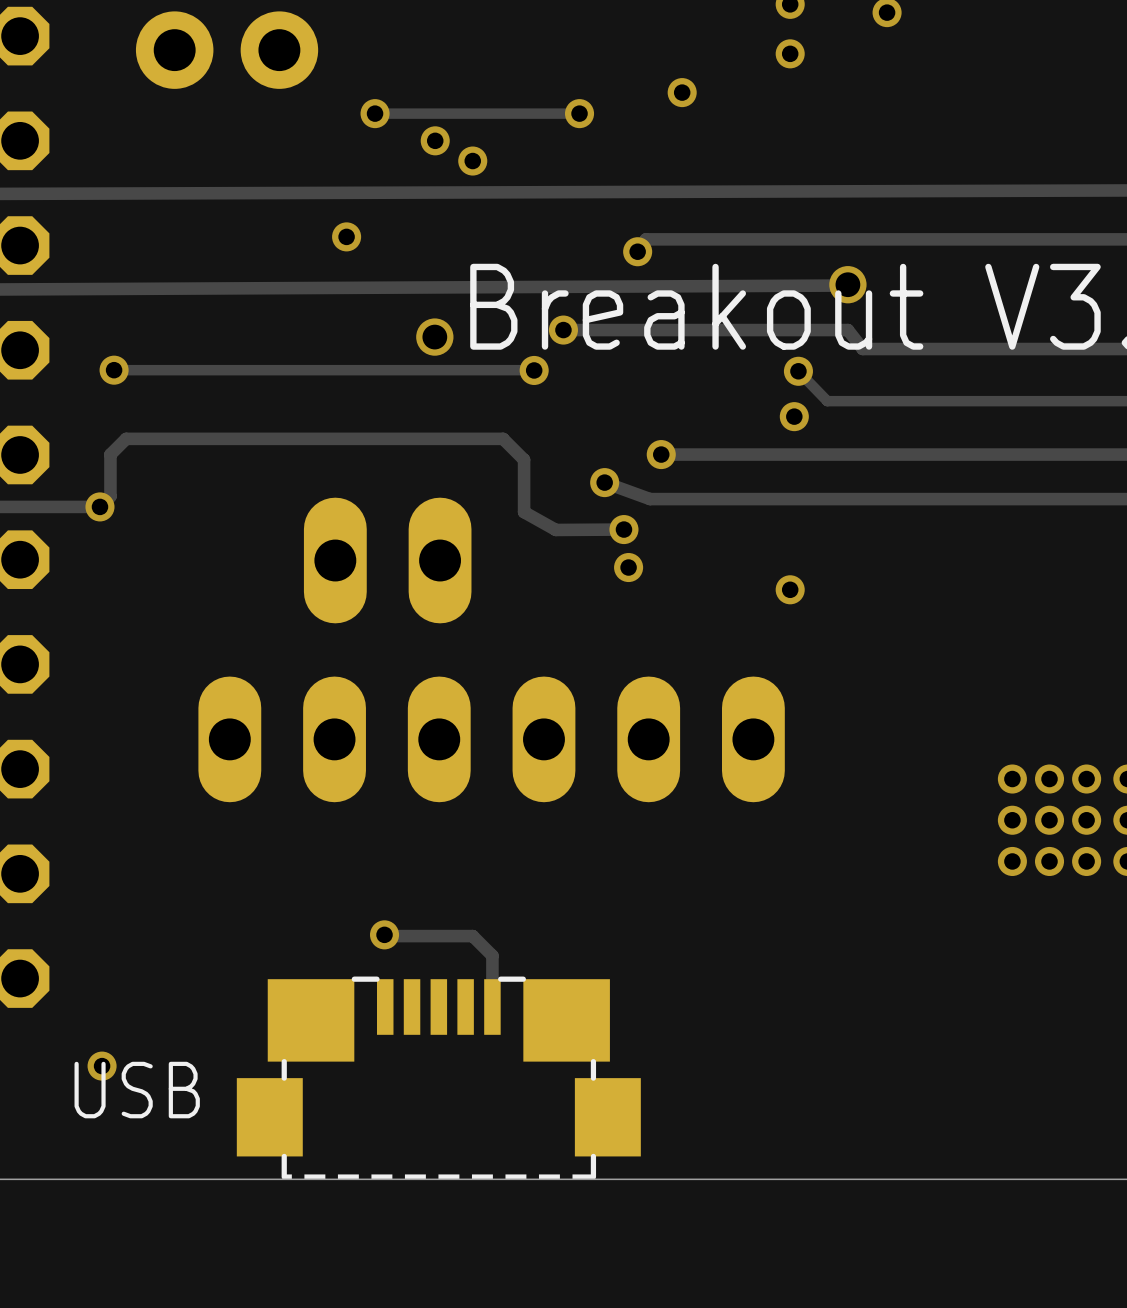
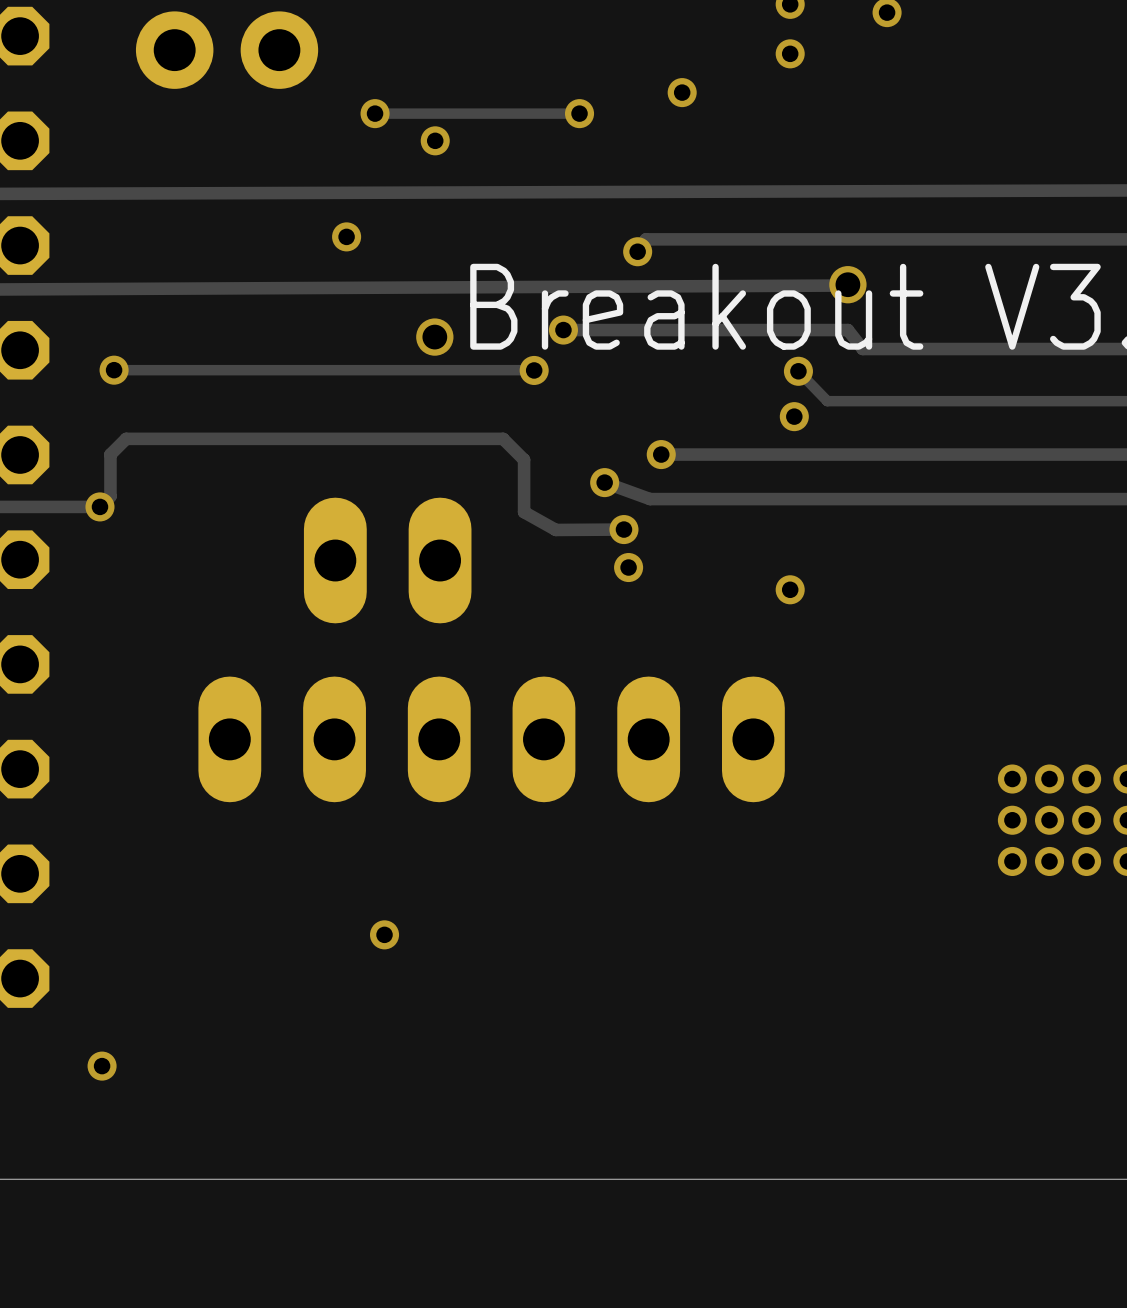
via: (472, 161) -> none
track: (384, 934) (472, 936) (492, 955) (492, 1007) -> none
USB: (438, 1078) -> none

